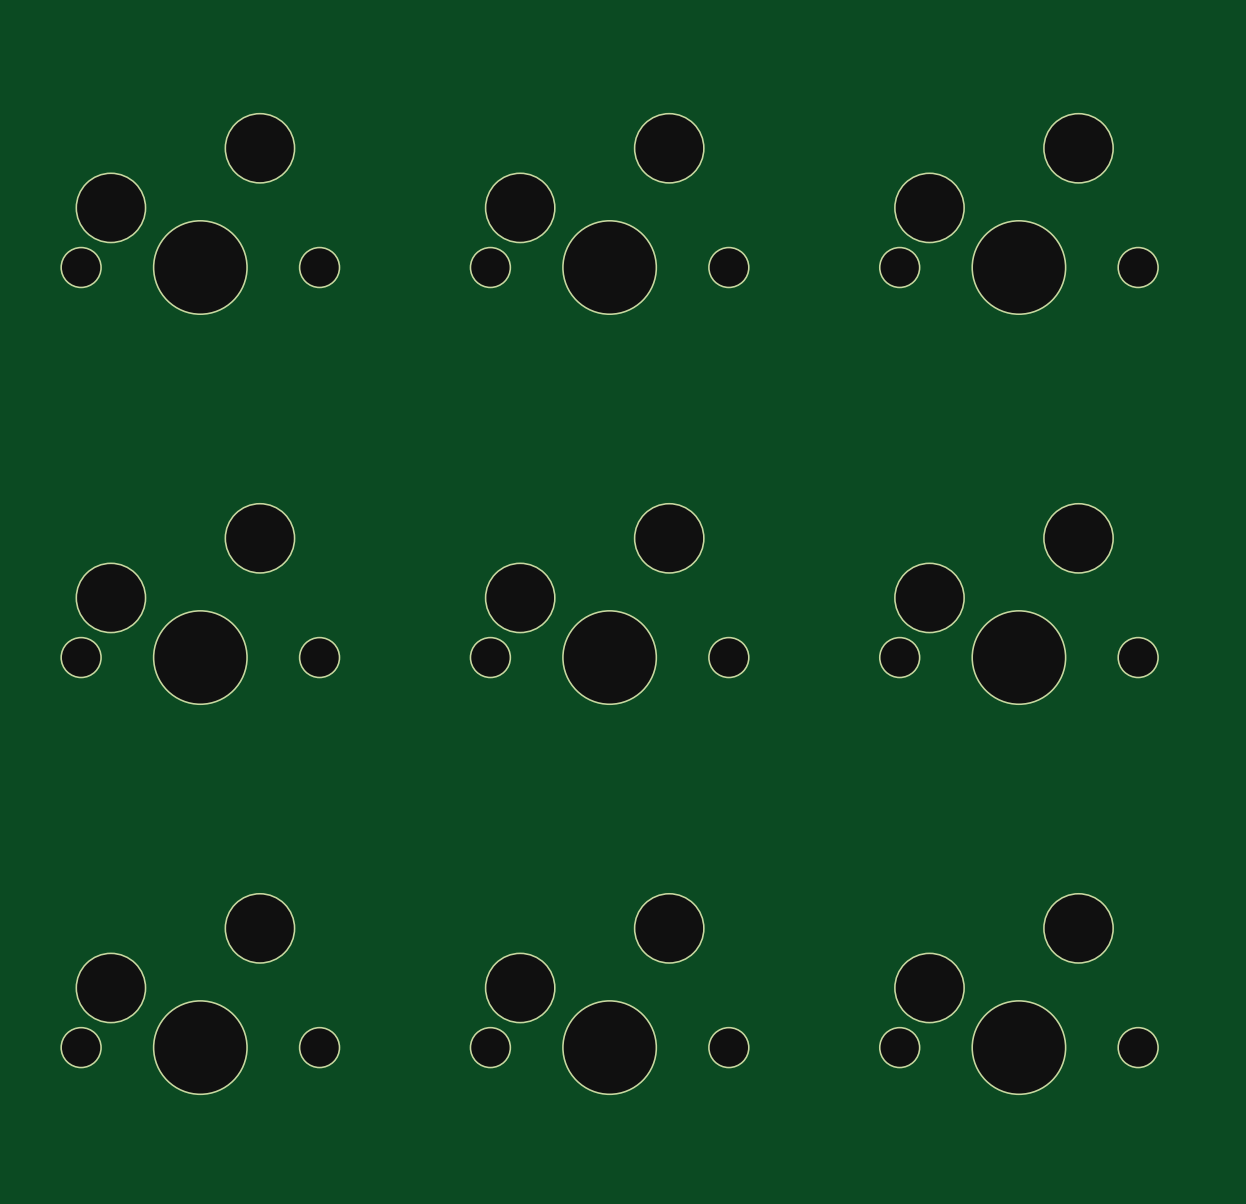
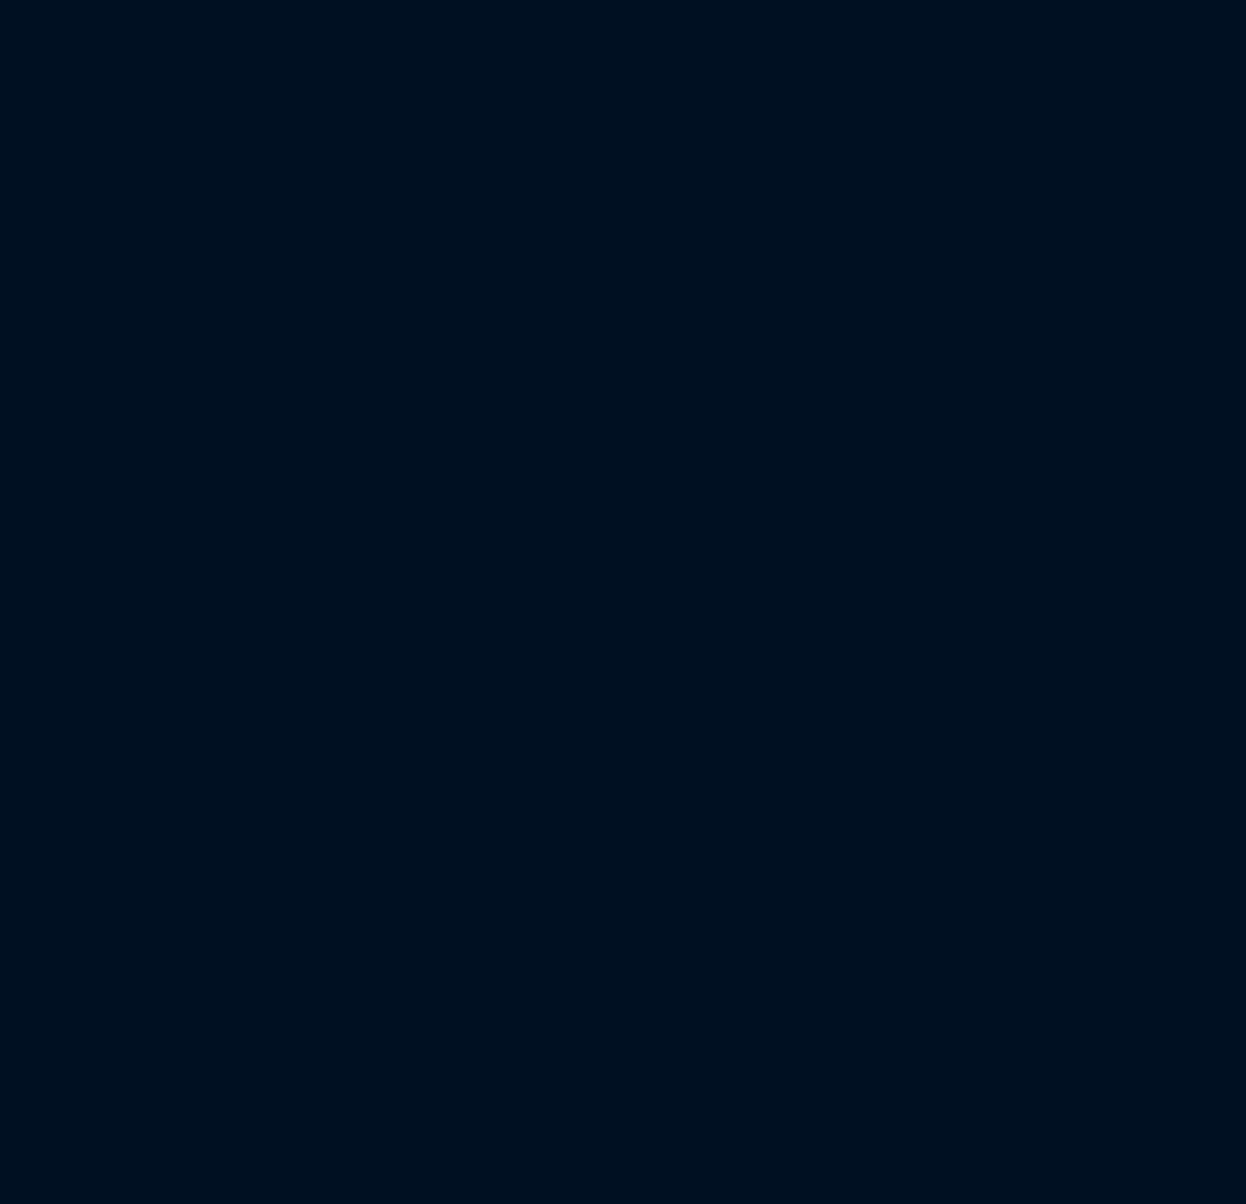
part: (200, 213) -> none
part: (609, 213) -> none
part: (1018, 213) -> none
part: (200, 603) -> none
part: (609, 603) -> none
part: (1018, 603) -> none
part: (200, 994) -> none
part: (609, 994) -> none
part: (1018, 994) -> none

